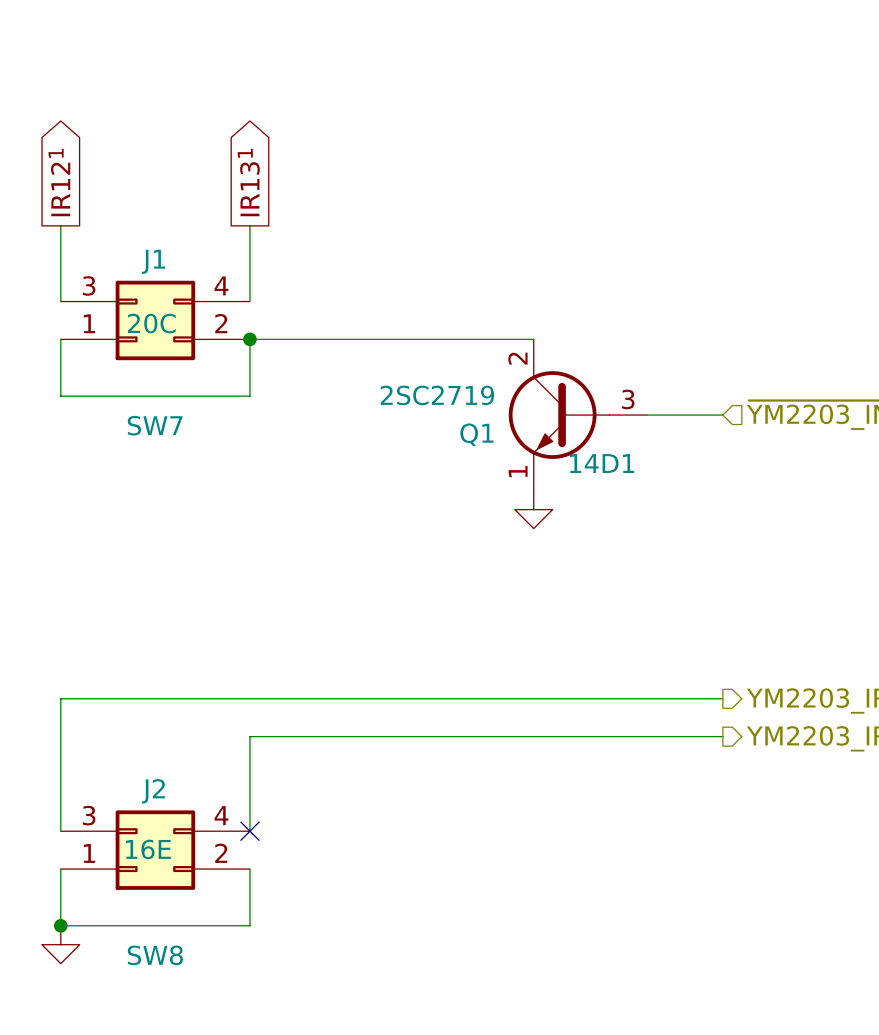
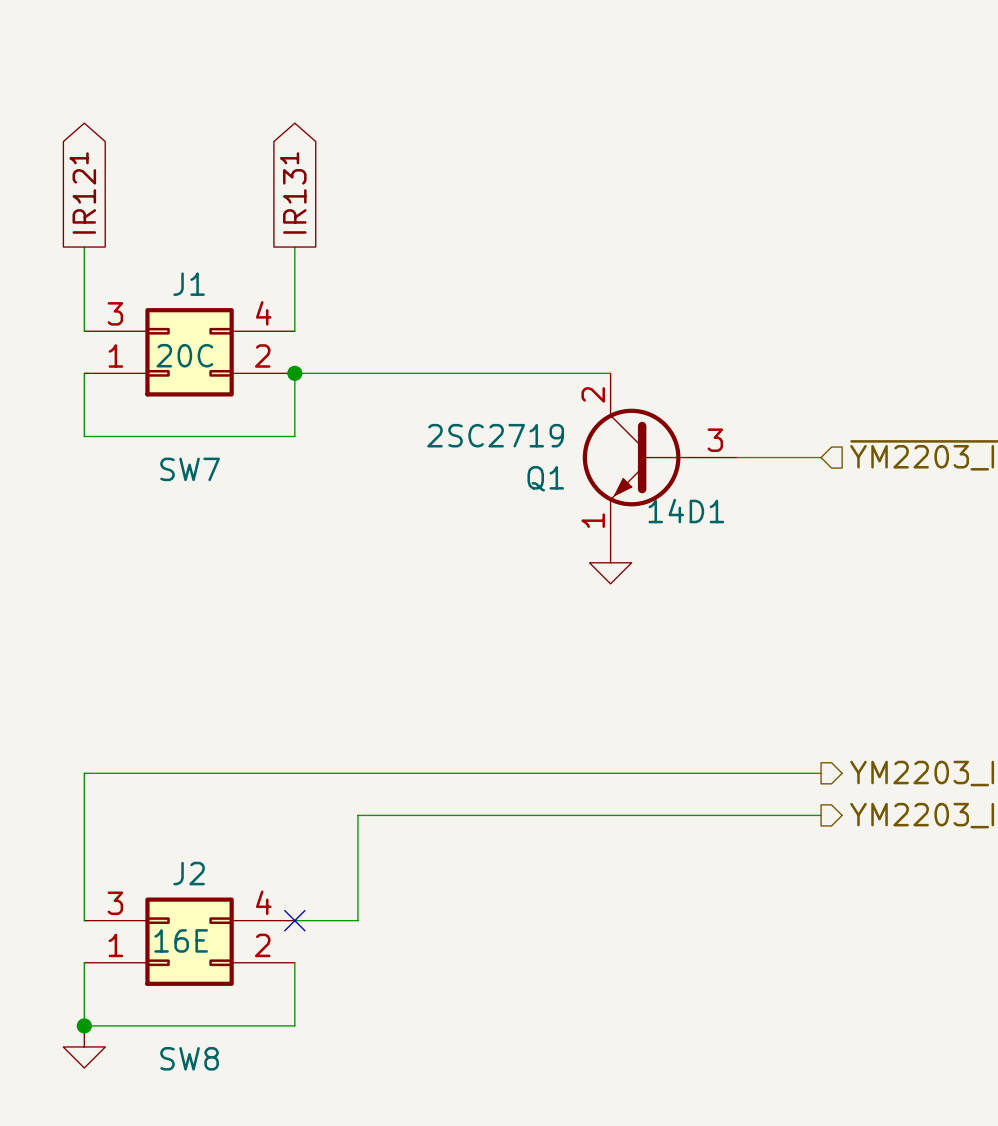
wire: (306, 736) (249, 736) (249, 831) -> (357, 815) (357, 920) (294, 920)

